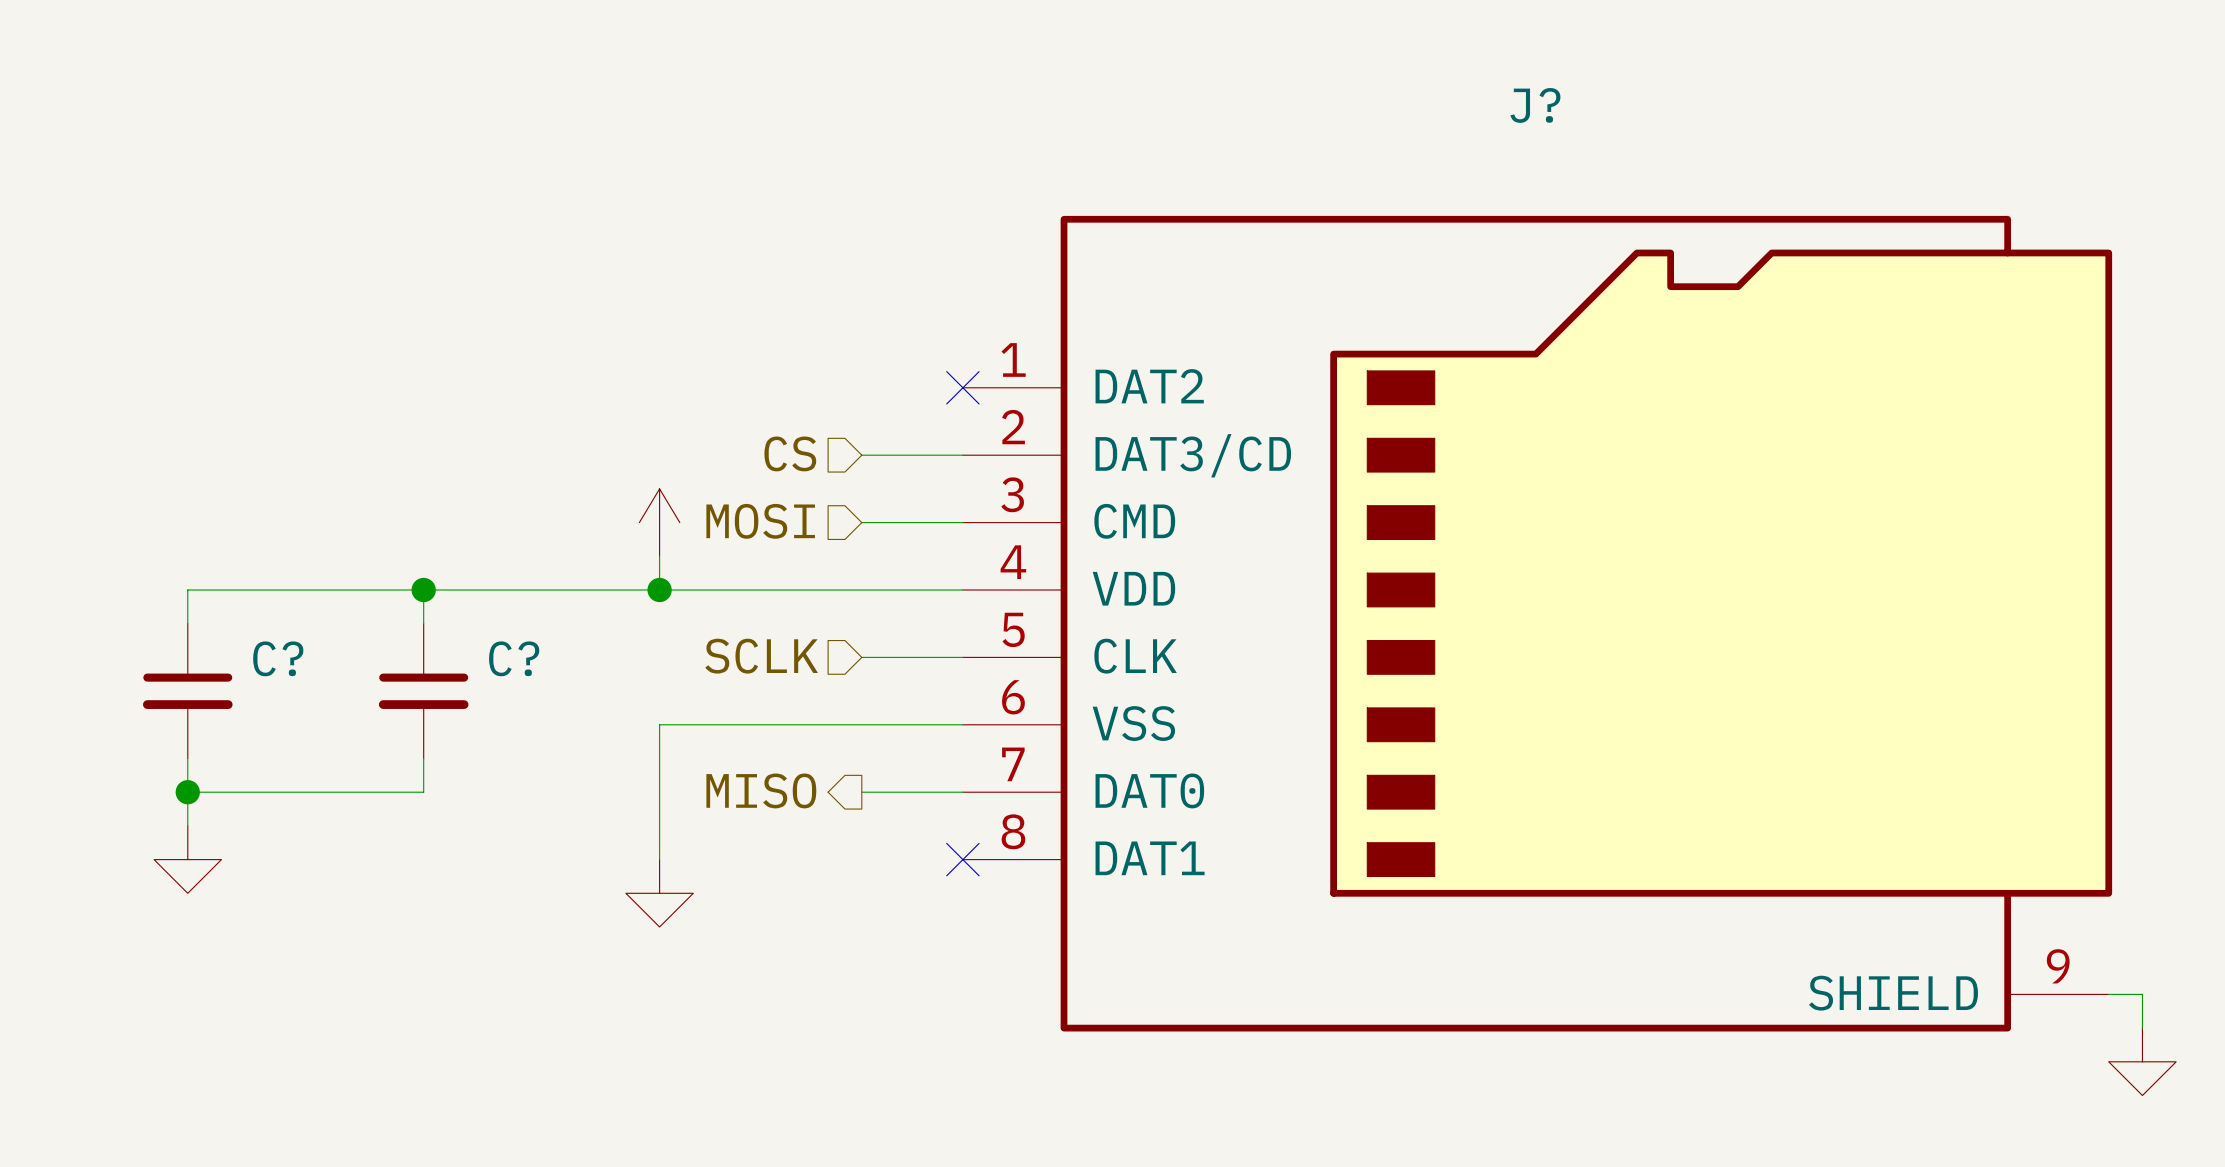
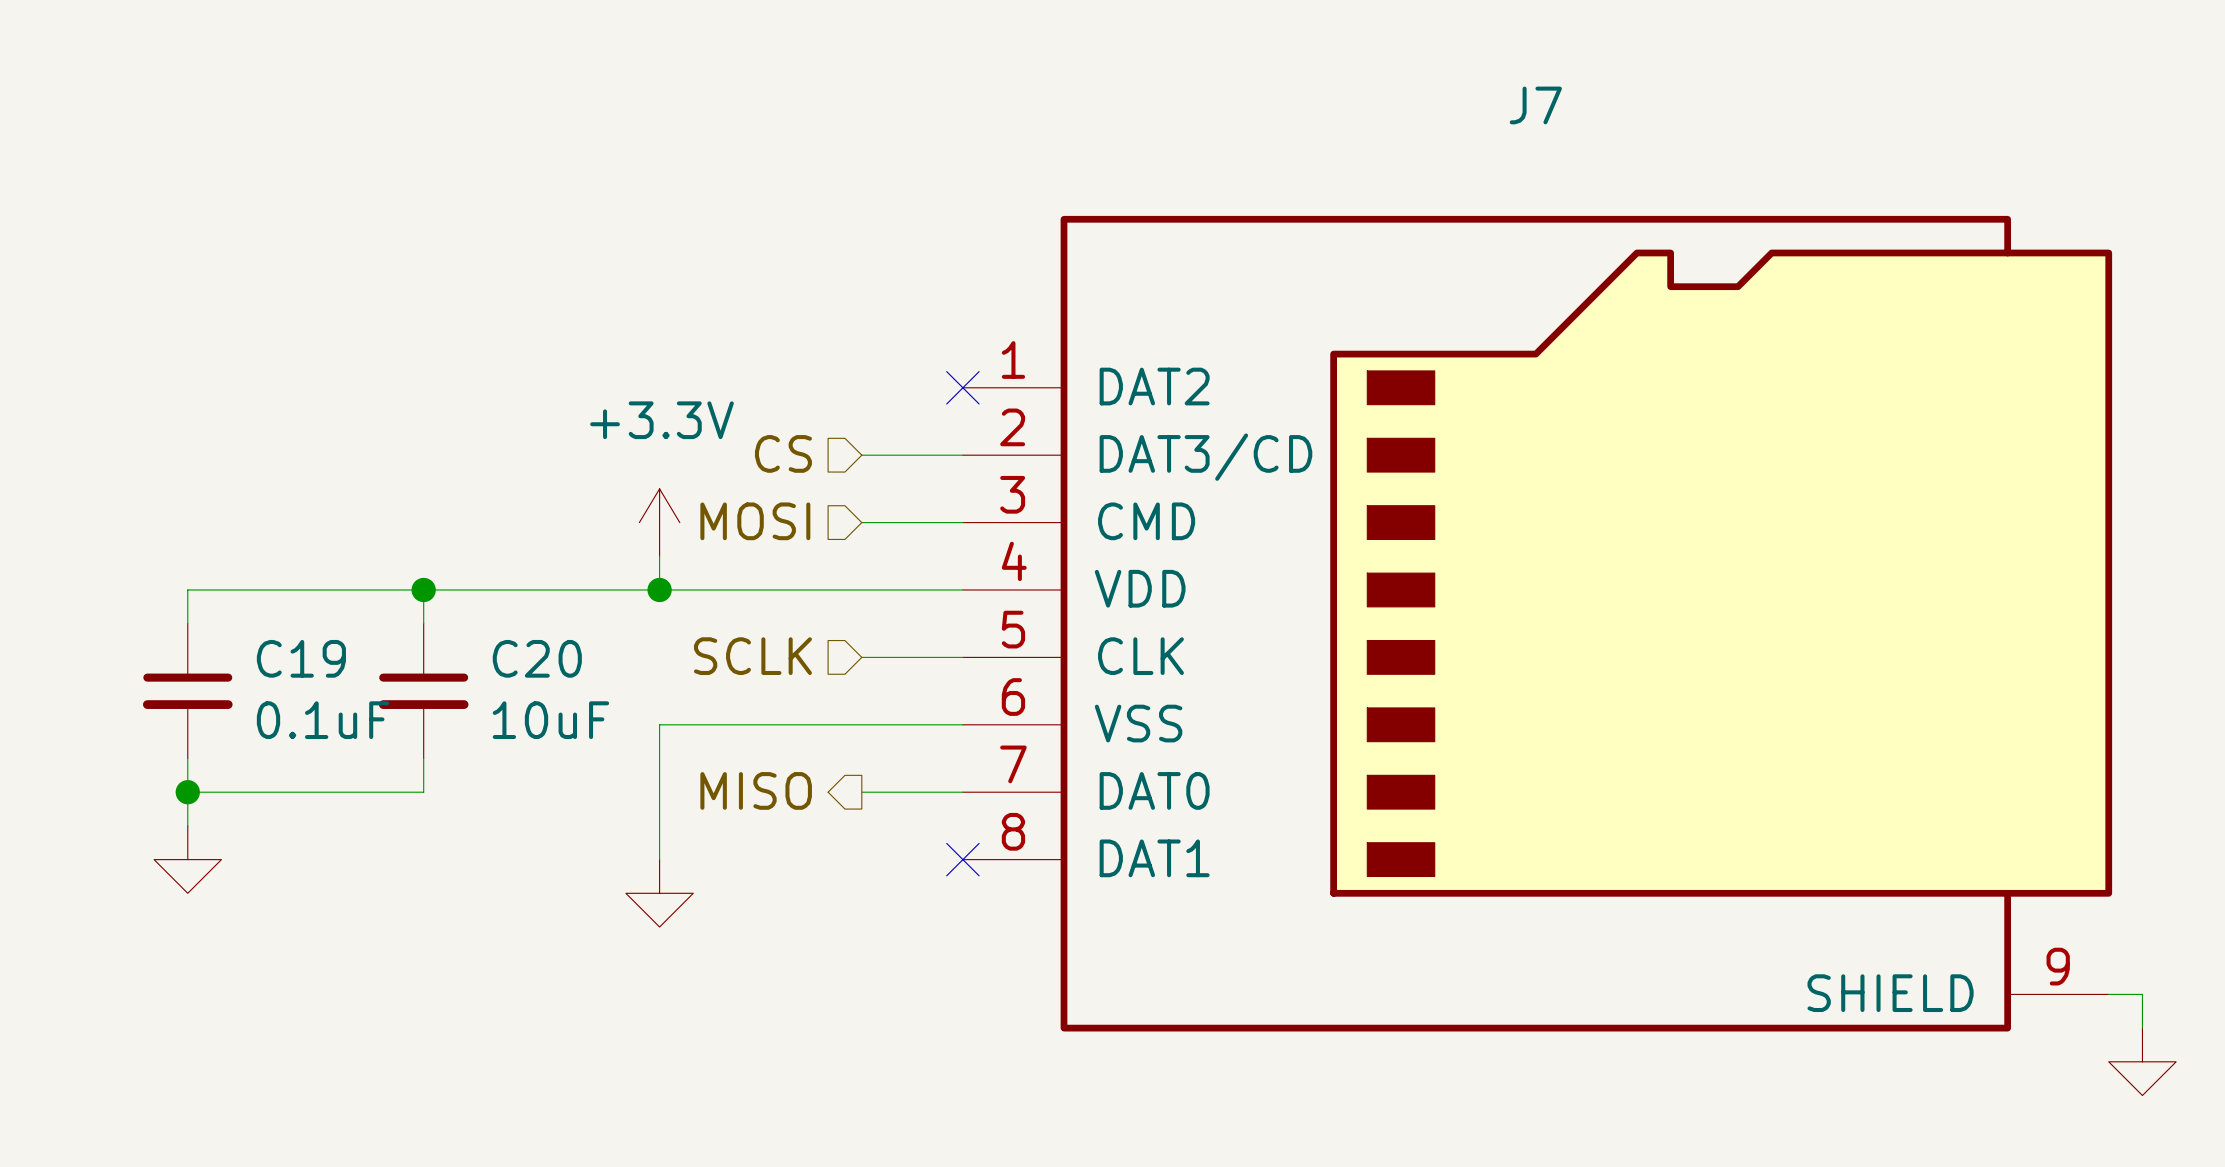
J? name: J? (1535, 105) -> J7 (1535, 105)
power symbol text: none -> +3.3V (662, 420)
C? name: C? (278, 658) -> C19 (301, 658)
C? name: C? (514, 658) -> C20 (537, 658)
C? value: none -> 0.1uF (323, 720)
C? value: none -> 10uF (550, 720)

